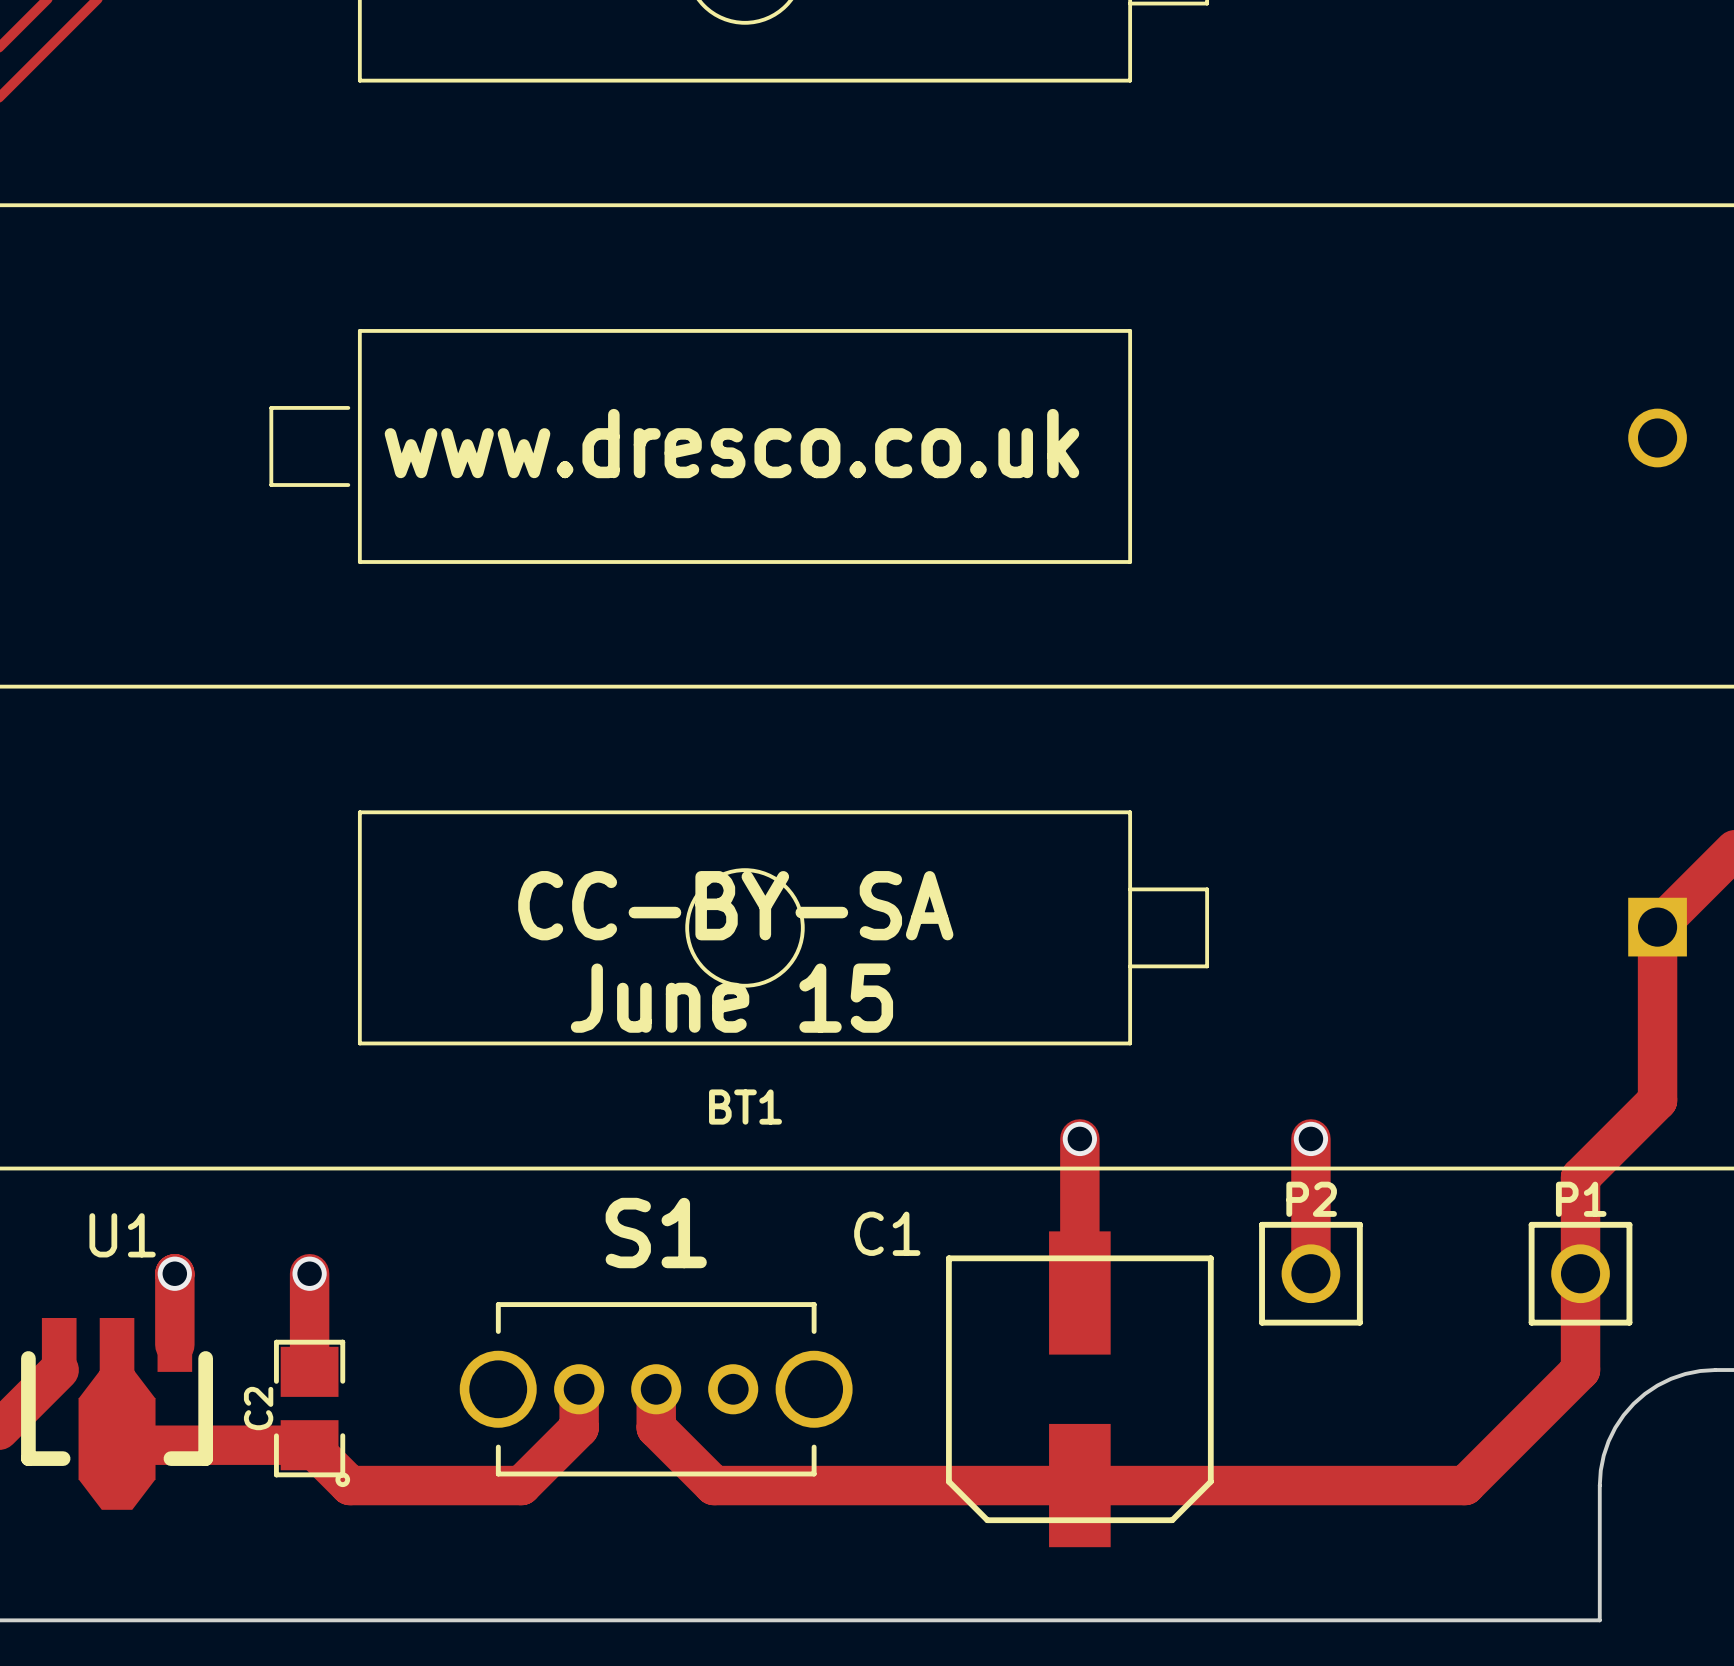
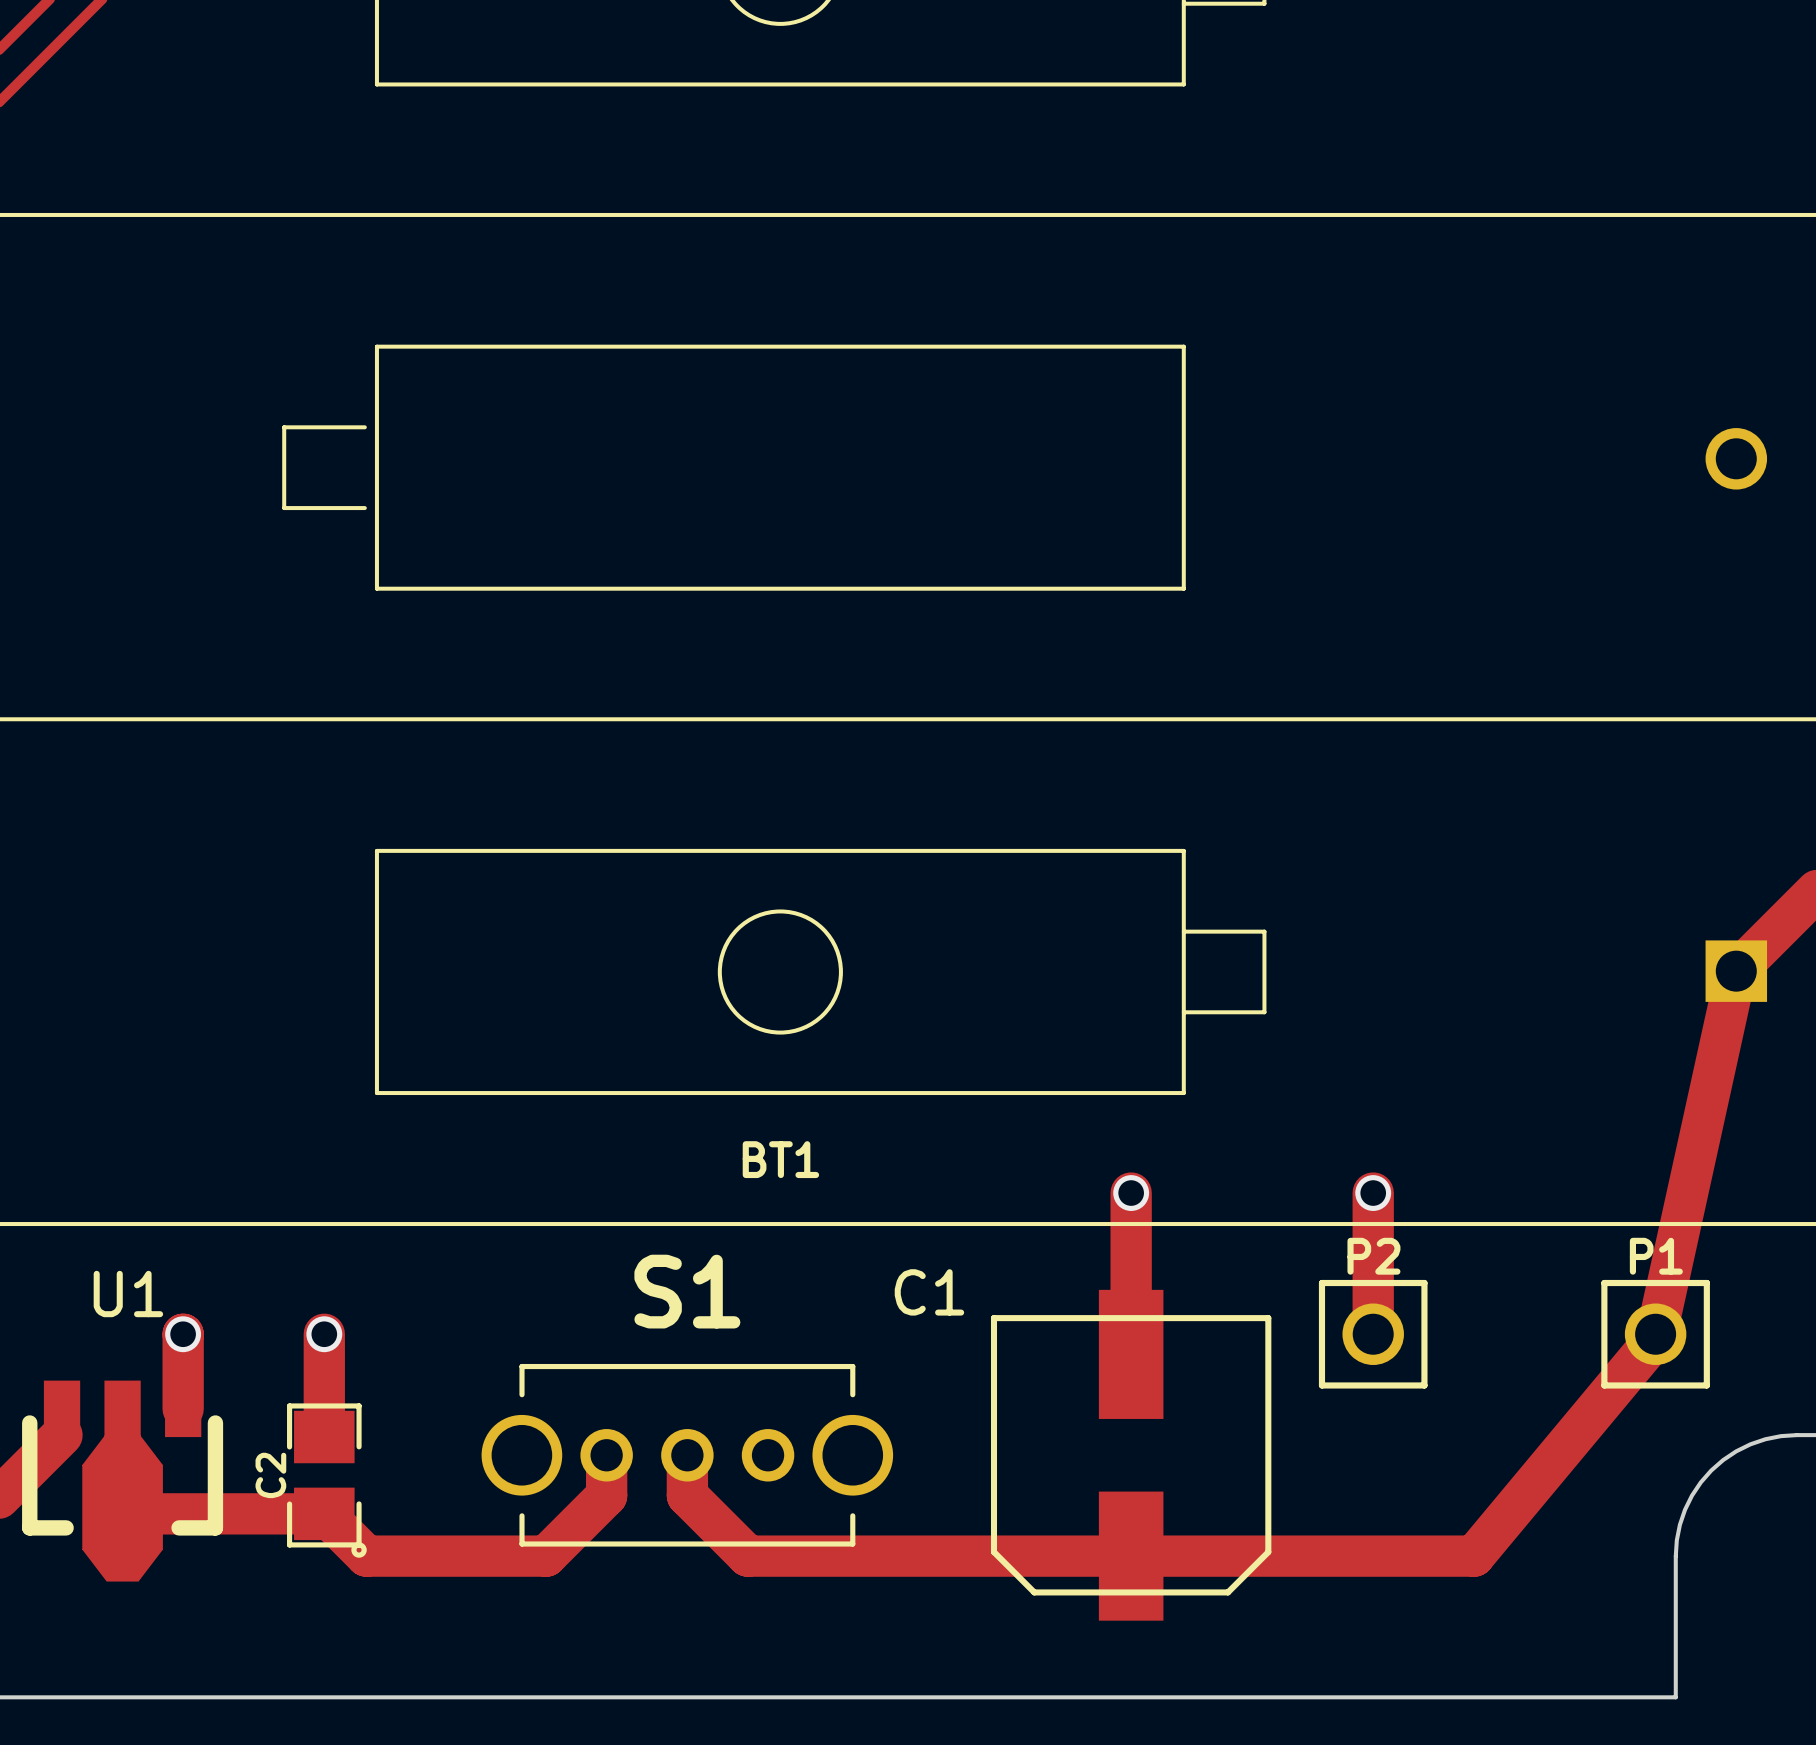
text: www.dresco.co.uk (731, 443) -> none
text: CC-BY-SA (735, 905) -> none
track: (1657, 927) (1657, 1100) (1580, 1177) (1580, 1370) (1464, 1485) (1407, 1485) -> (1736, 971) (1655, 1338) (1474, 1556)
text: June 15 (731, 998) -> none

